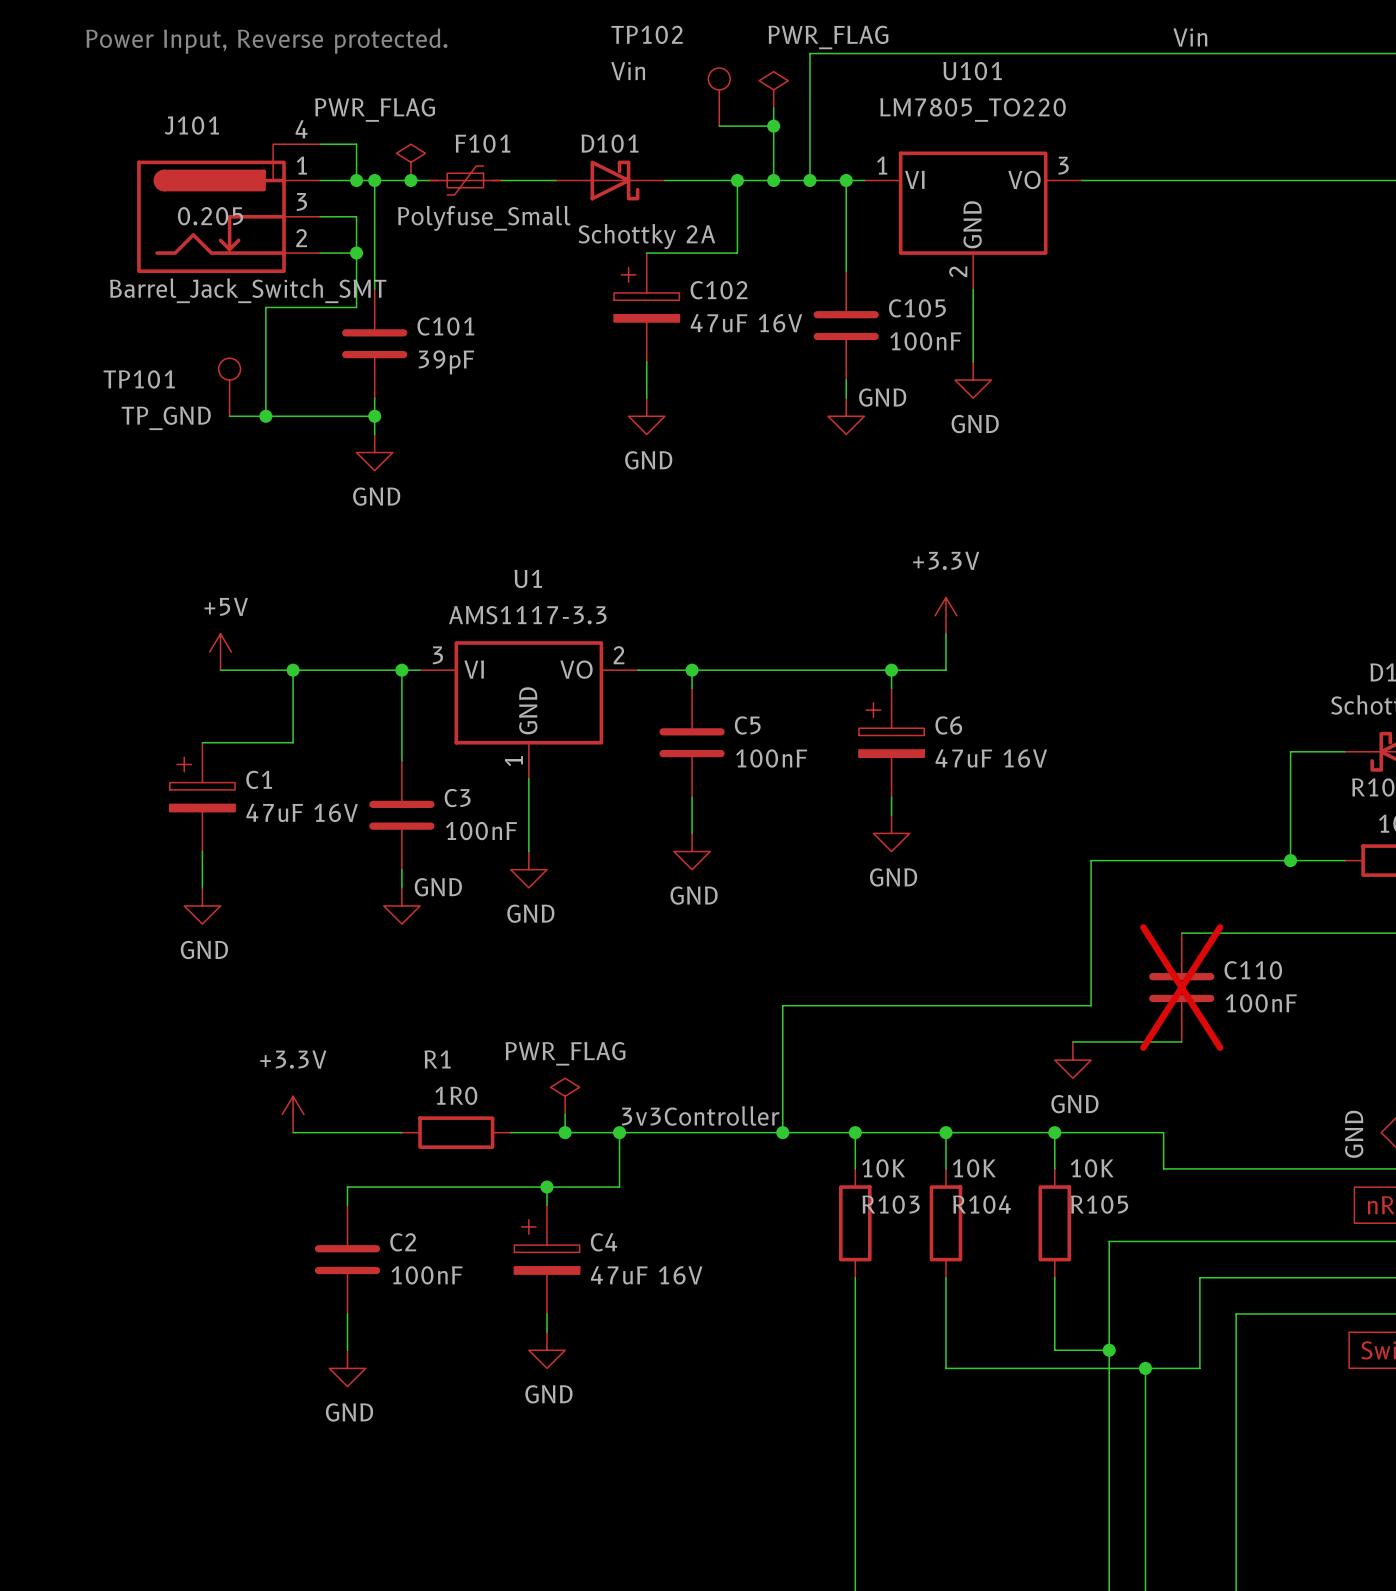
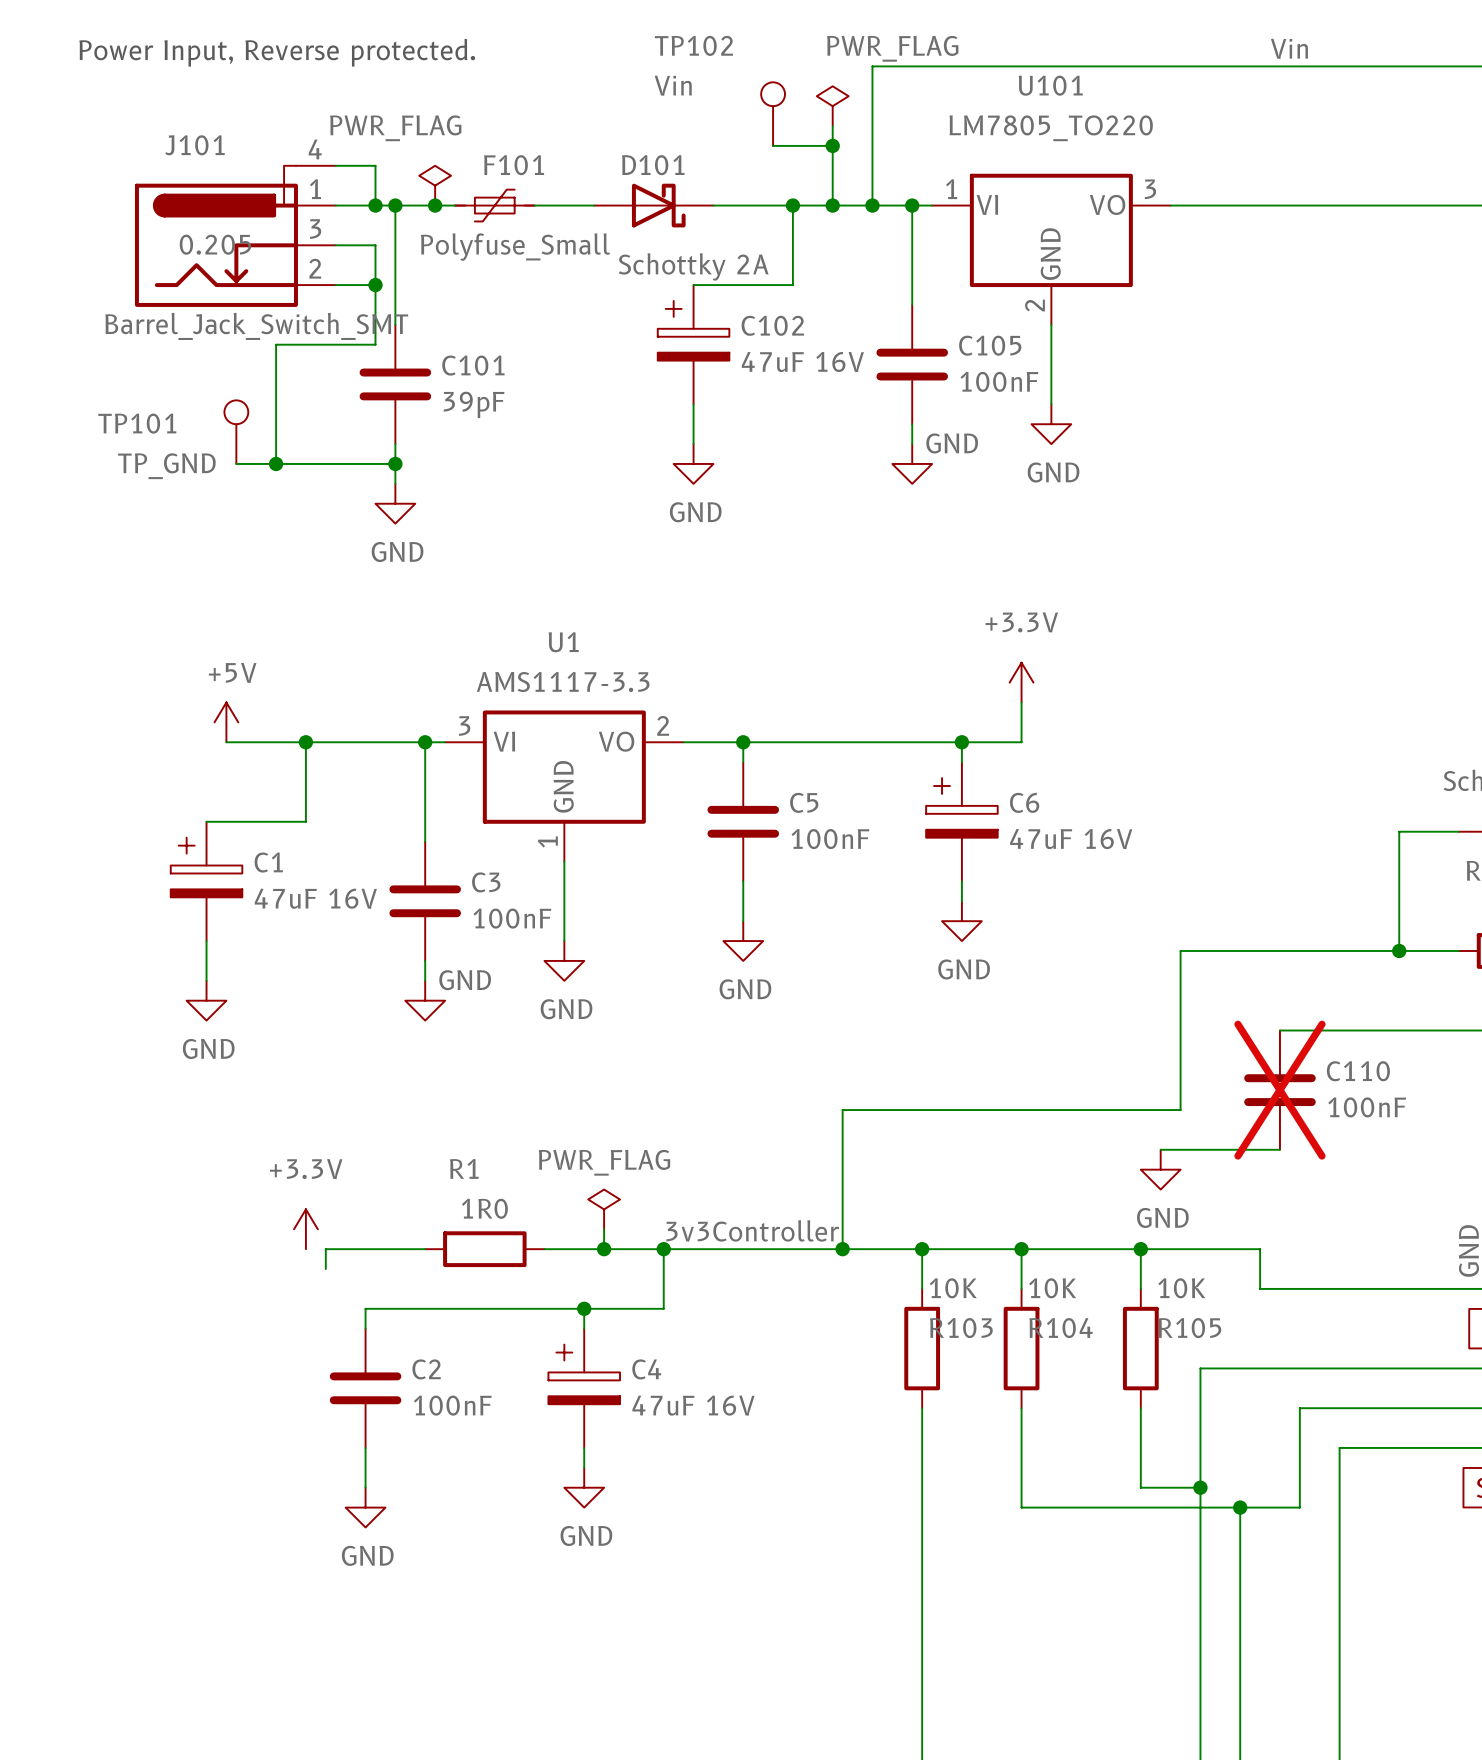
wire: (293, 1132) (311, 1132) -> (325, 1269) (325, 1249)

